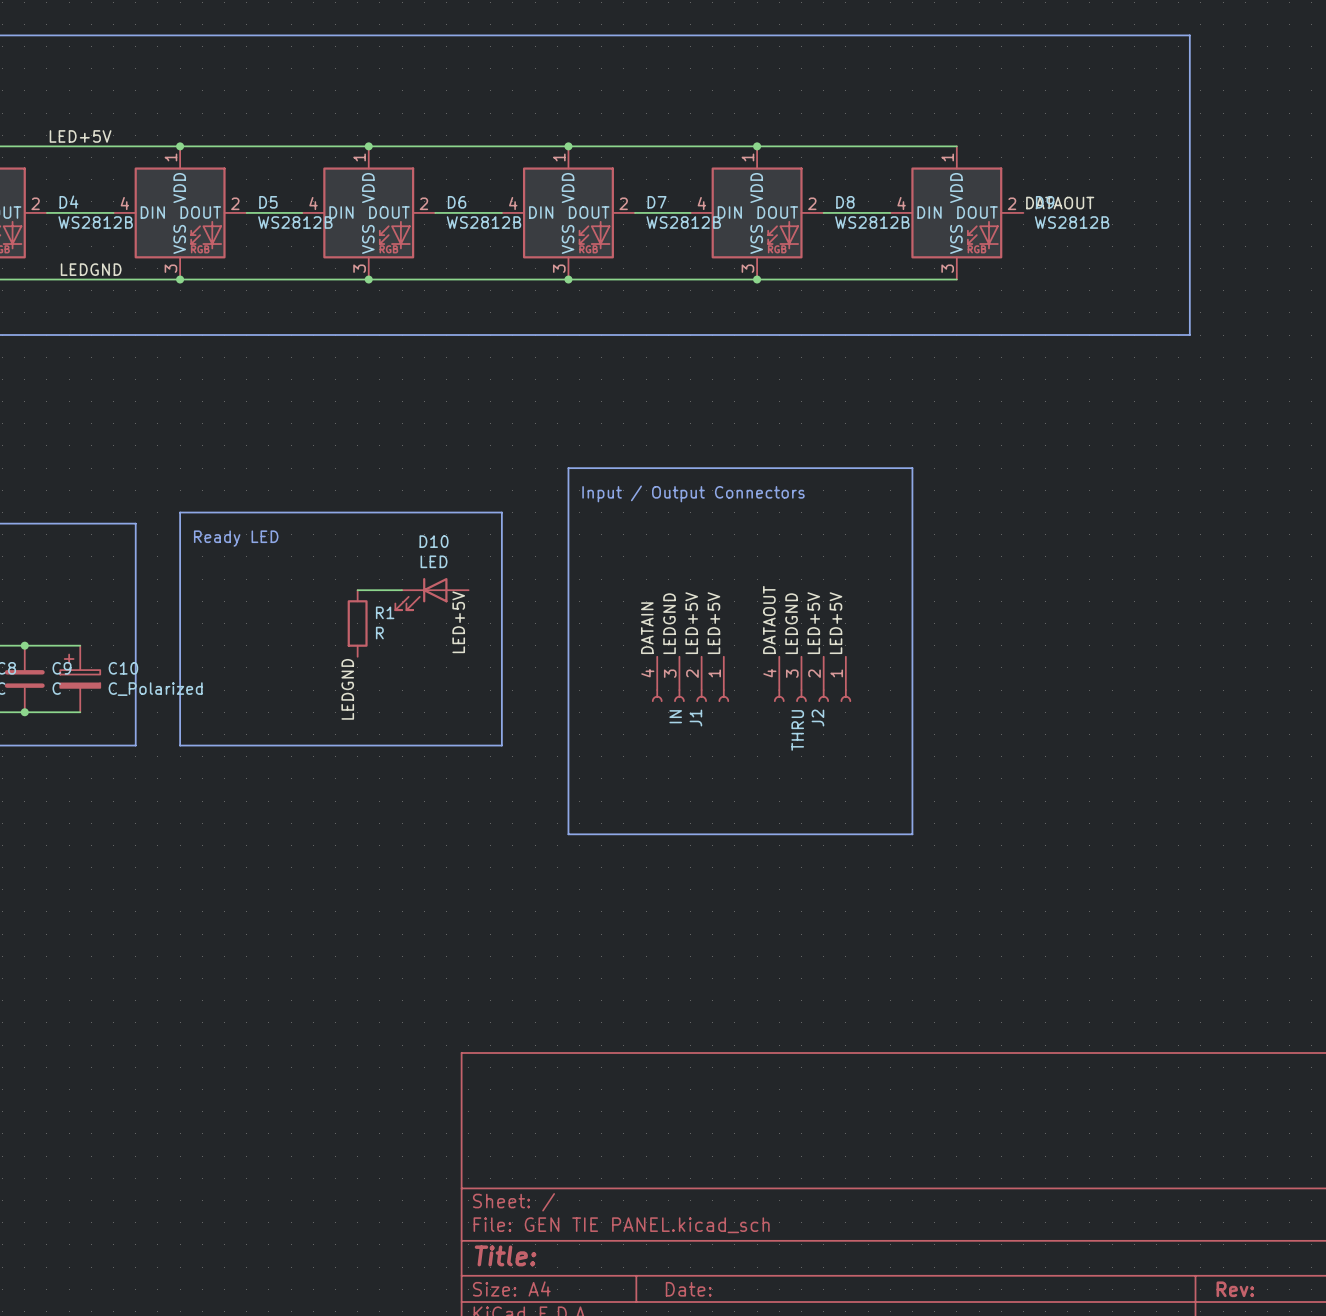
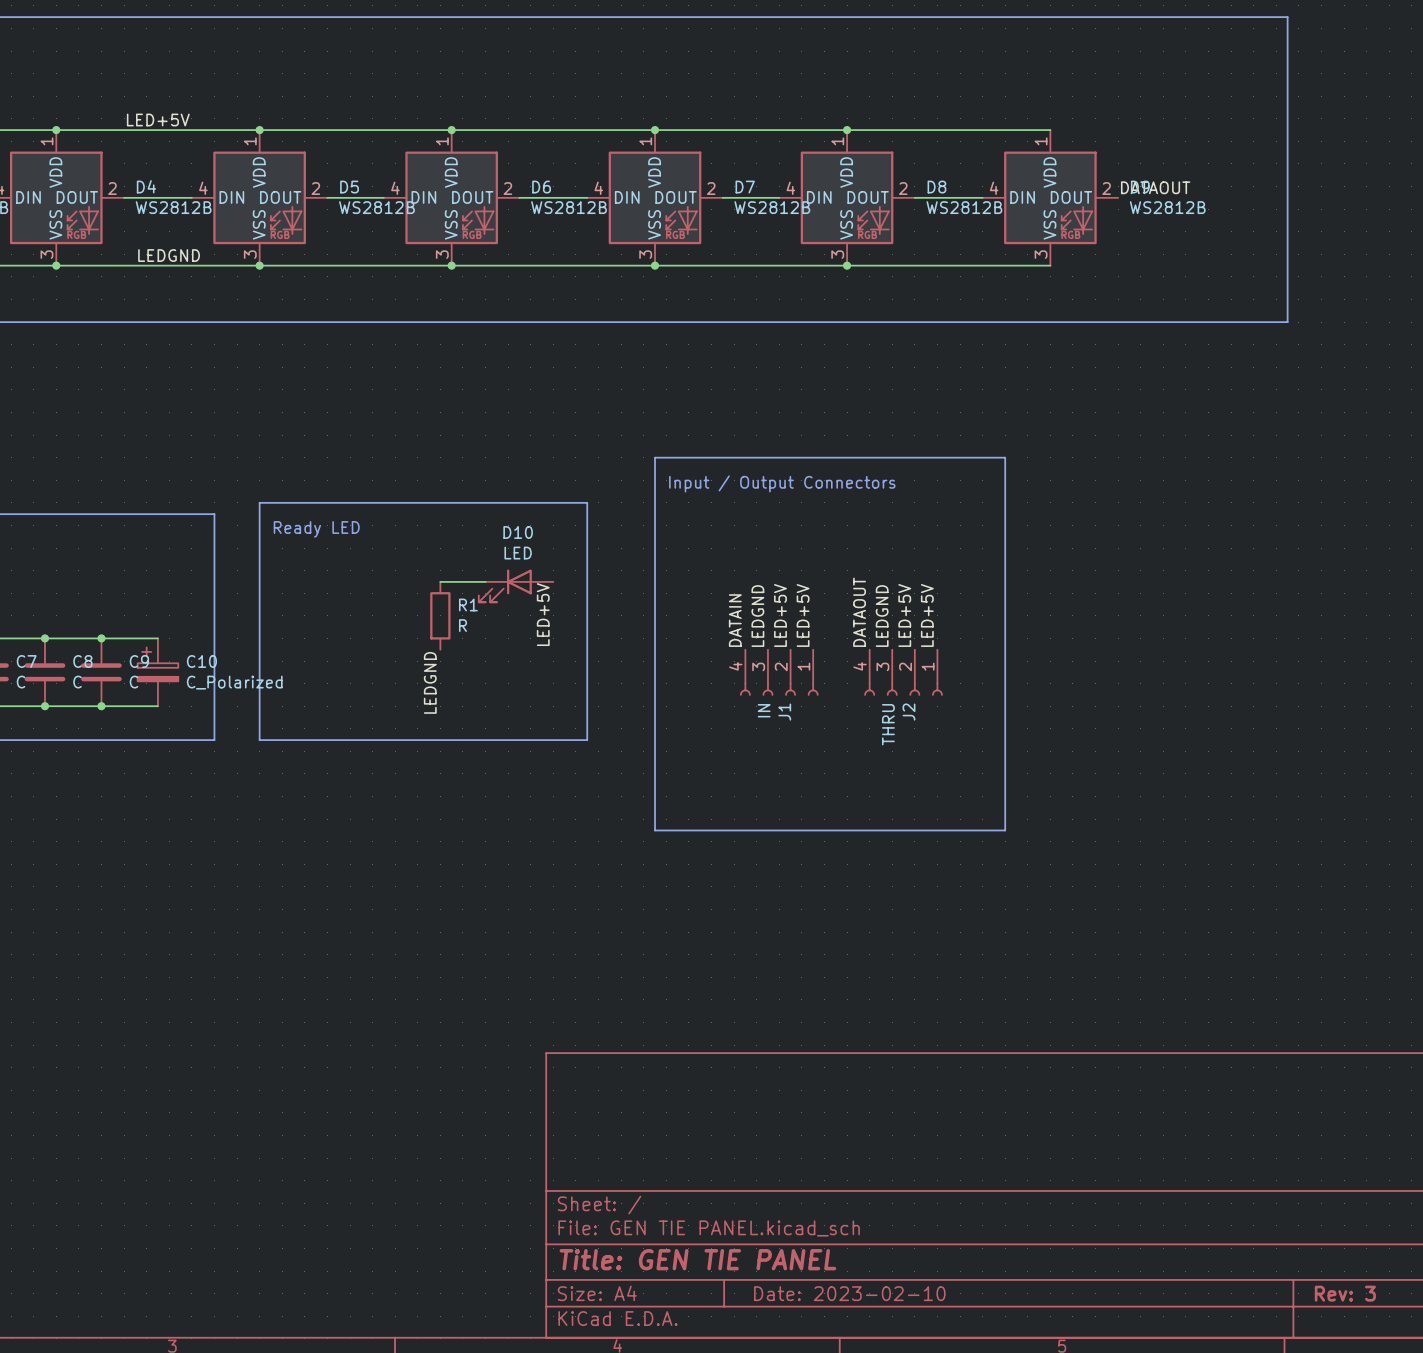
title block: Title: (505, 1255) -> Title: GEN TIE PANEL (697, 1259)
title block: Date: (688, 1289) -> Date: 2023-02-10 (849, 1293)
title block: Rev: (1235, 1289) -> Rev: 3 (1345, 1293)

